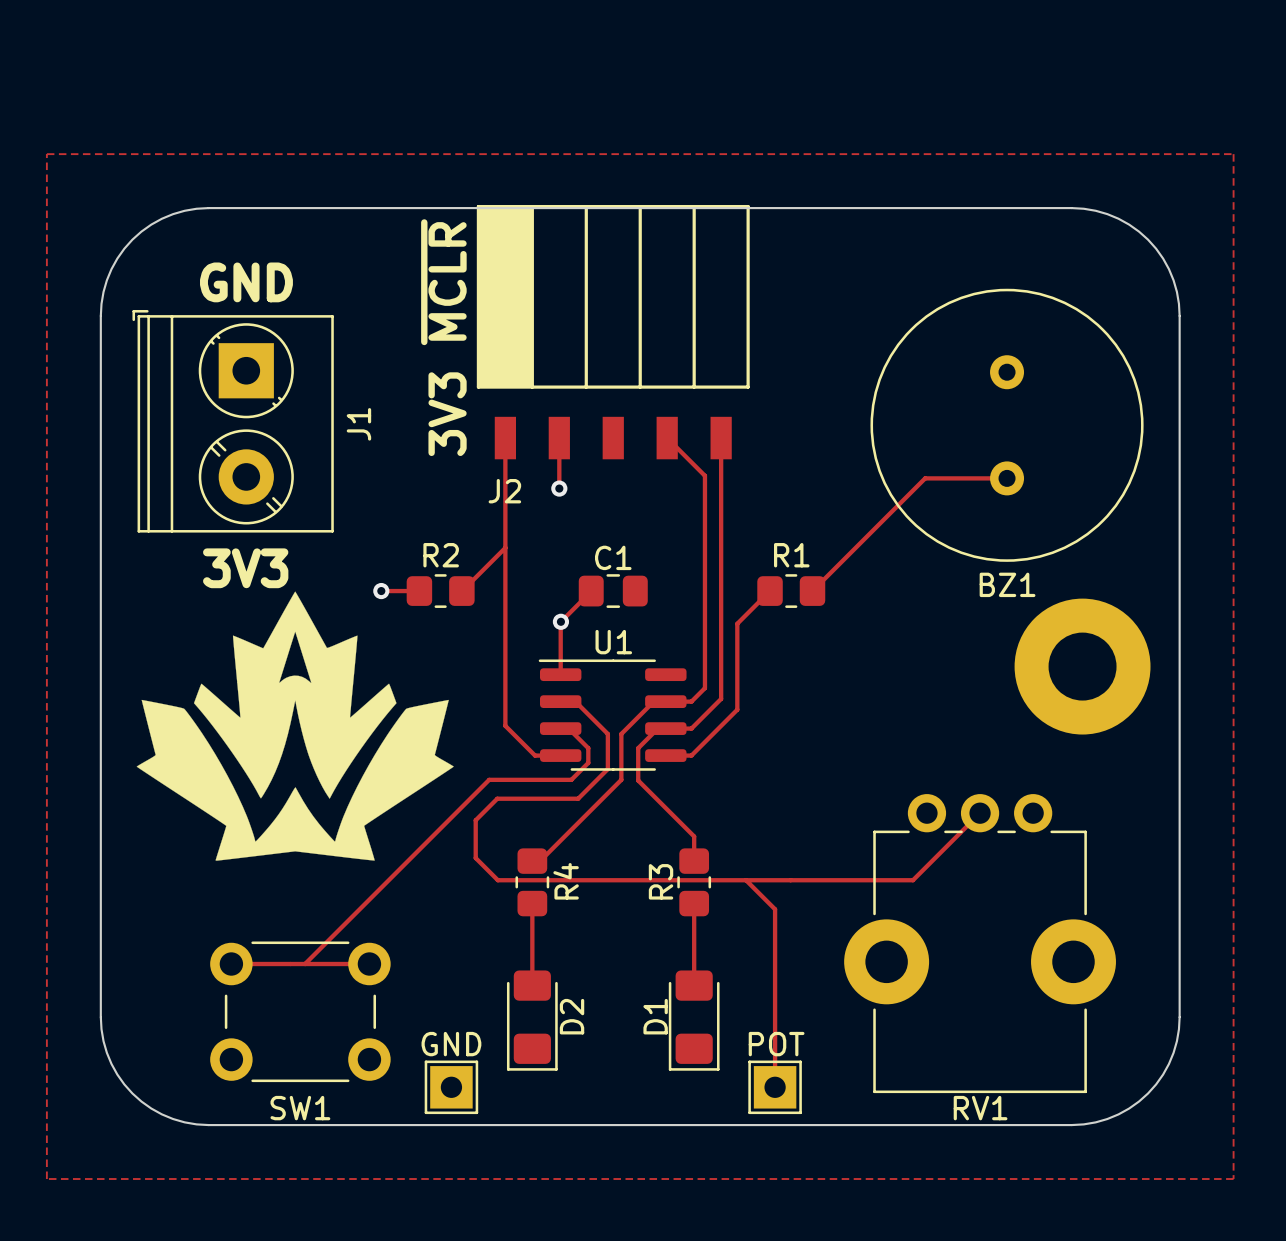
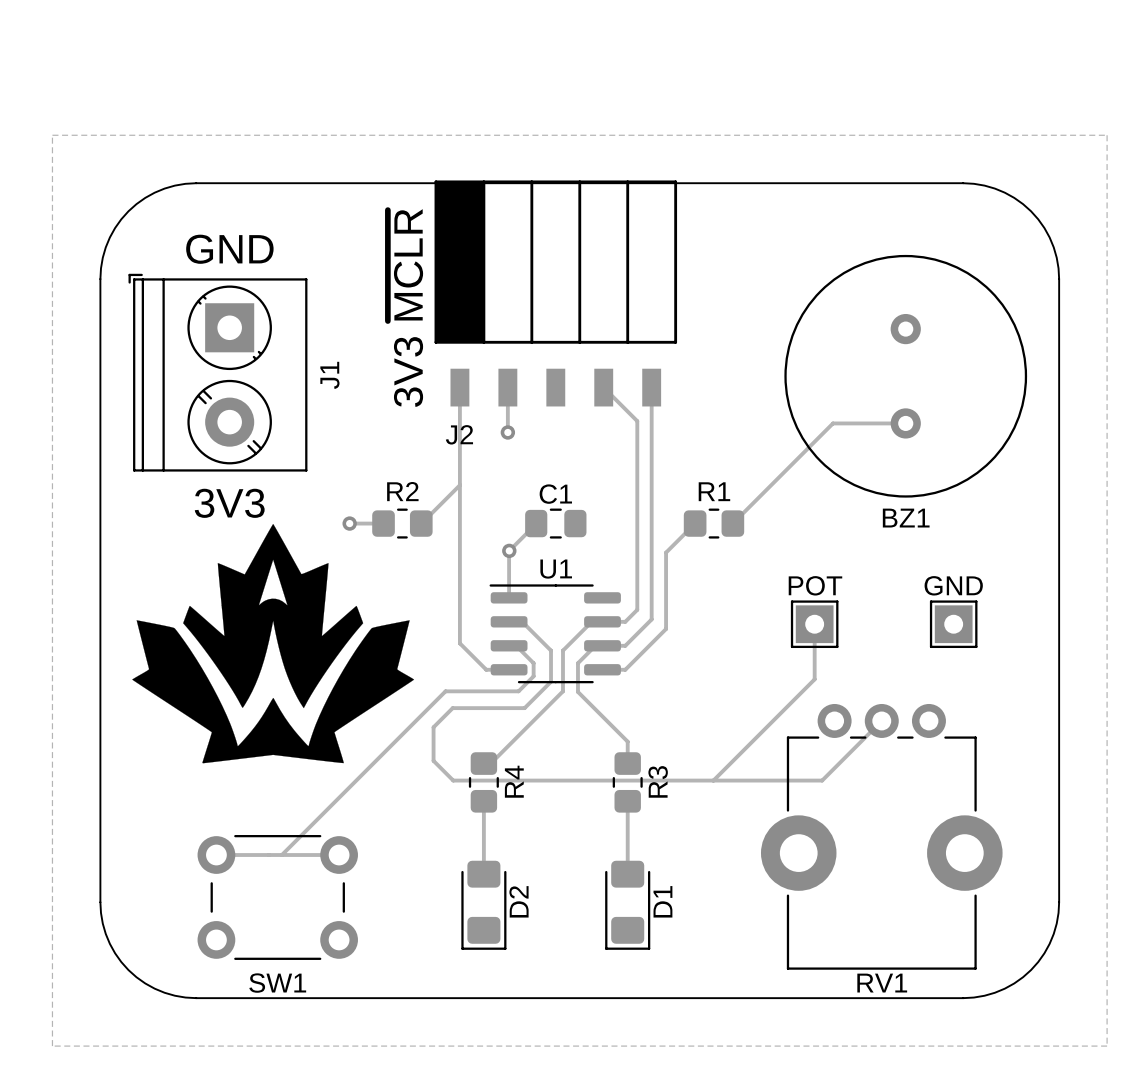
part: (1082, 666) -> none
track: none -> (814, 624) (814, 679) (713, 780)
GND: none -> (953, 624)
track: (746, 880) (775, 909) (775, 1087) -> none
R3 name position: R3 (661, 881) -> R3 (658, 781)
D1 name position: D1 (655, 1016) -> D1 (662, 901)
GND: (451, 1087) -> none
POT position: (775, 1087) -> (814, 624)

